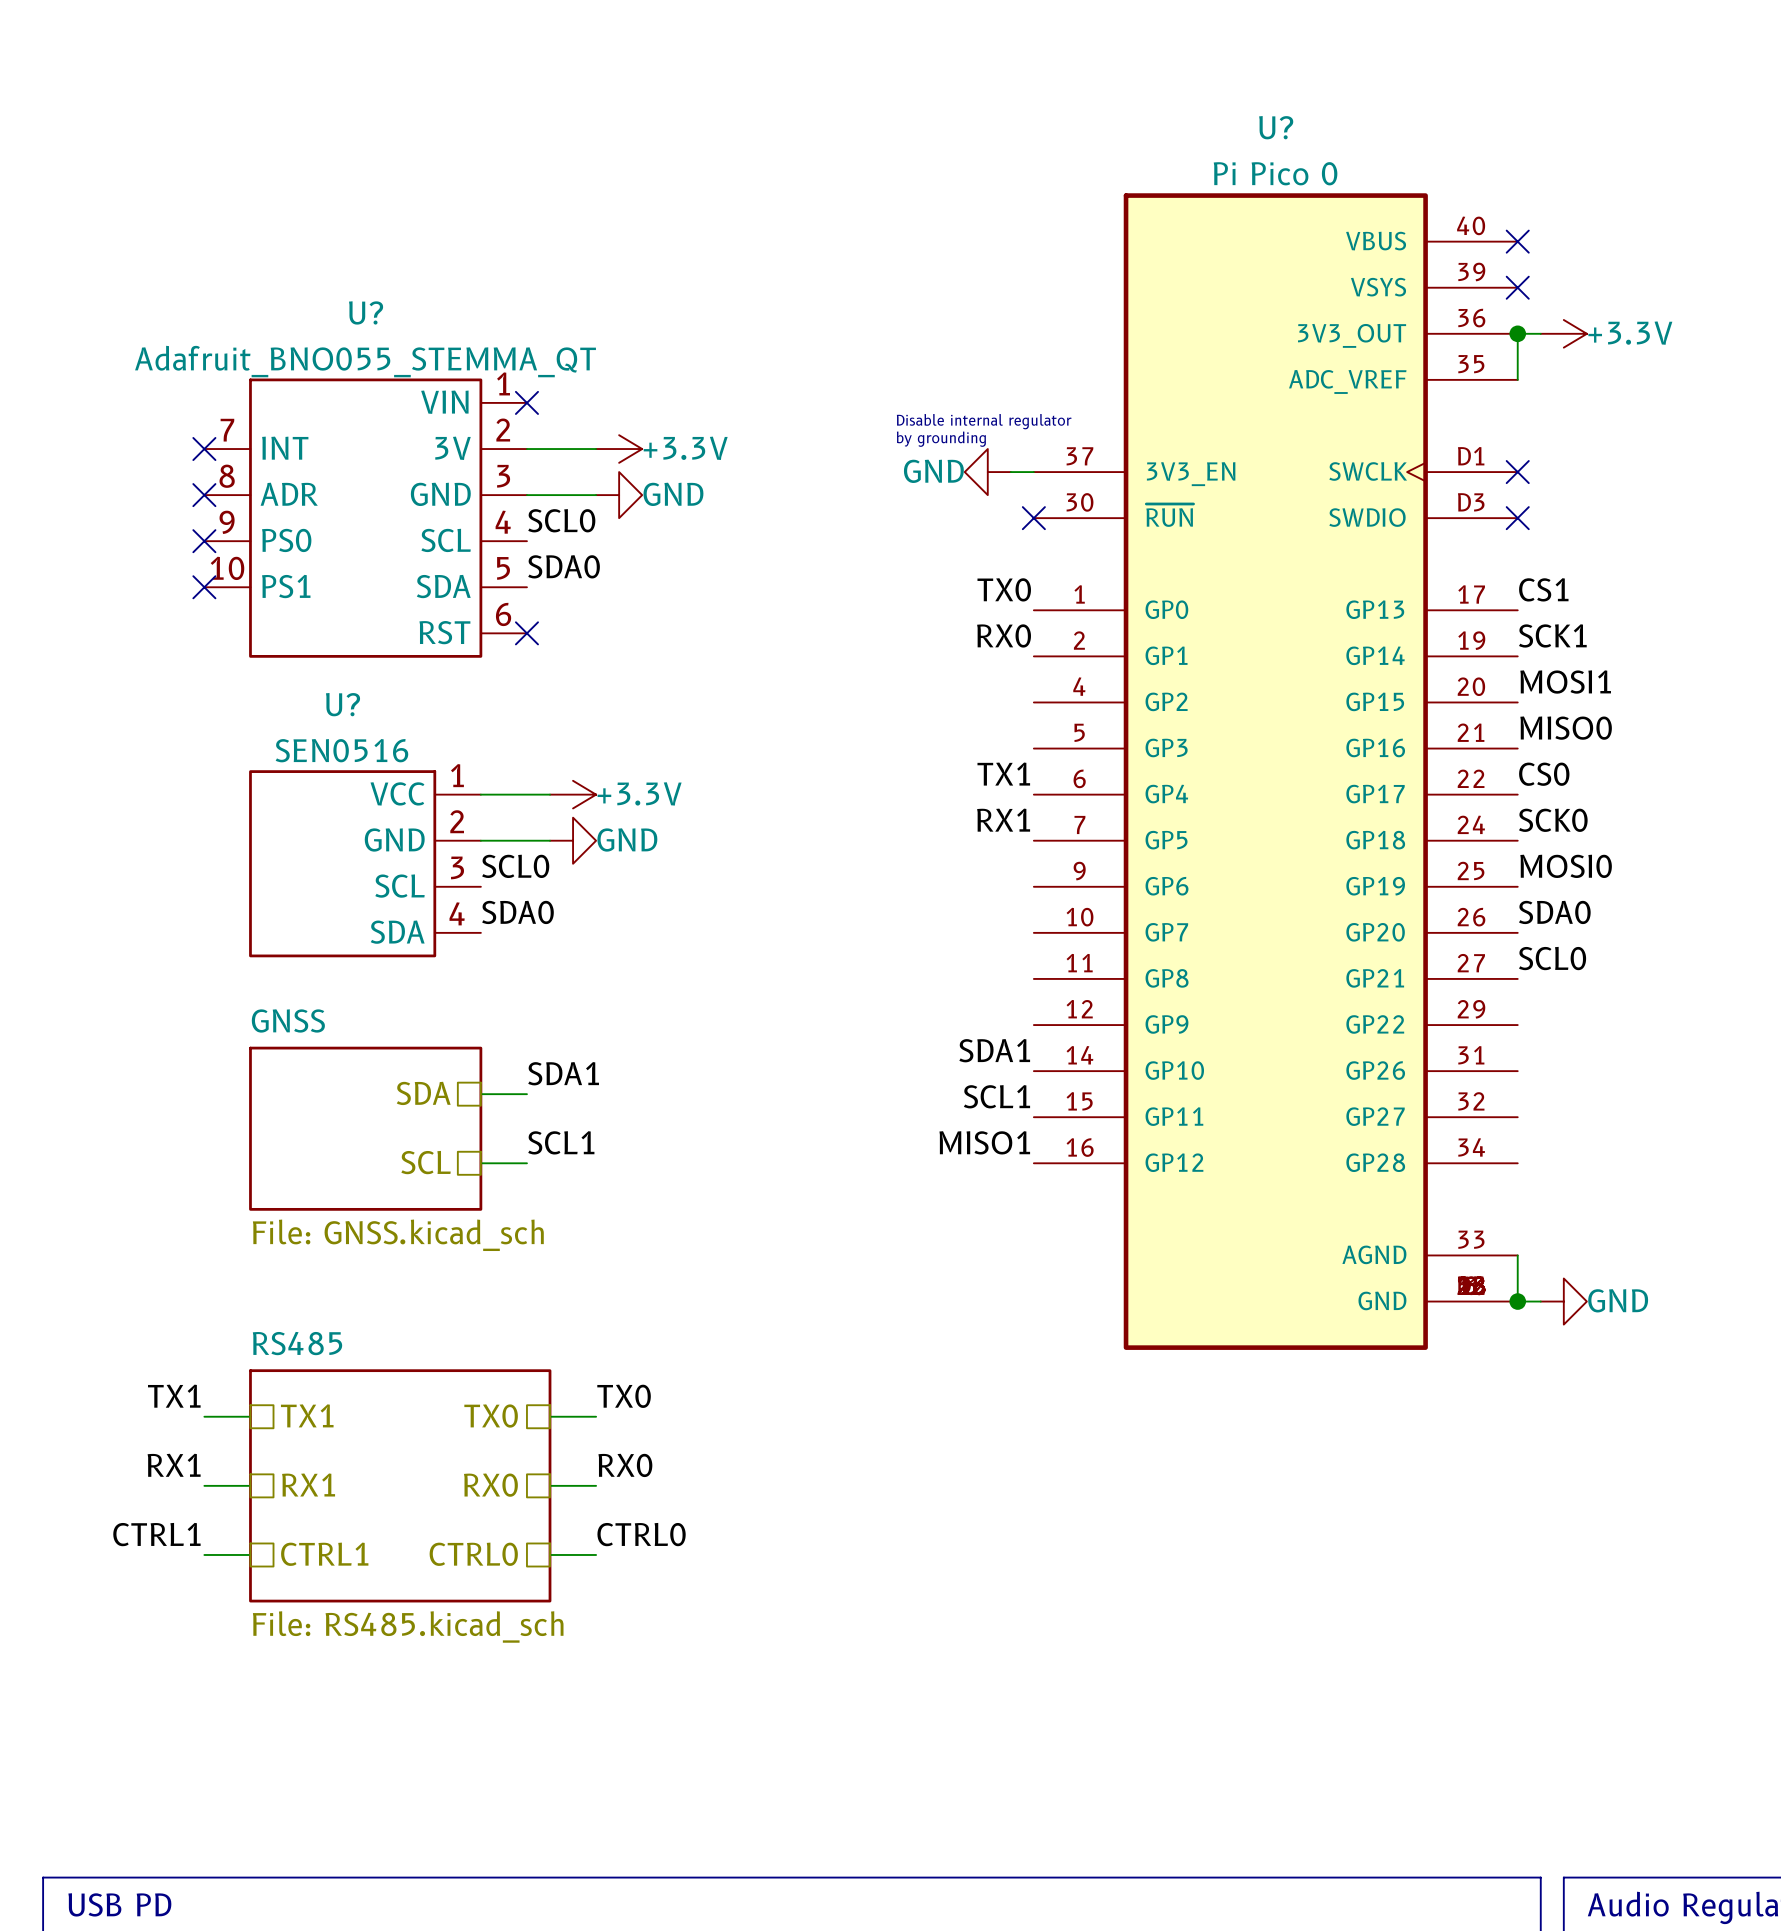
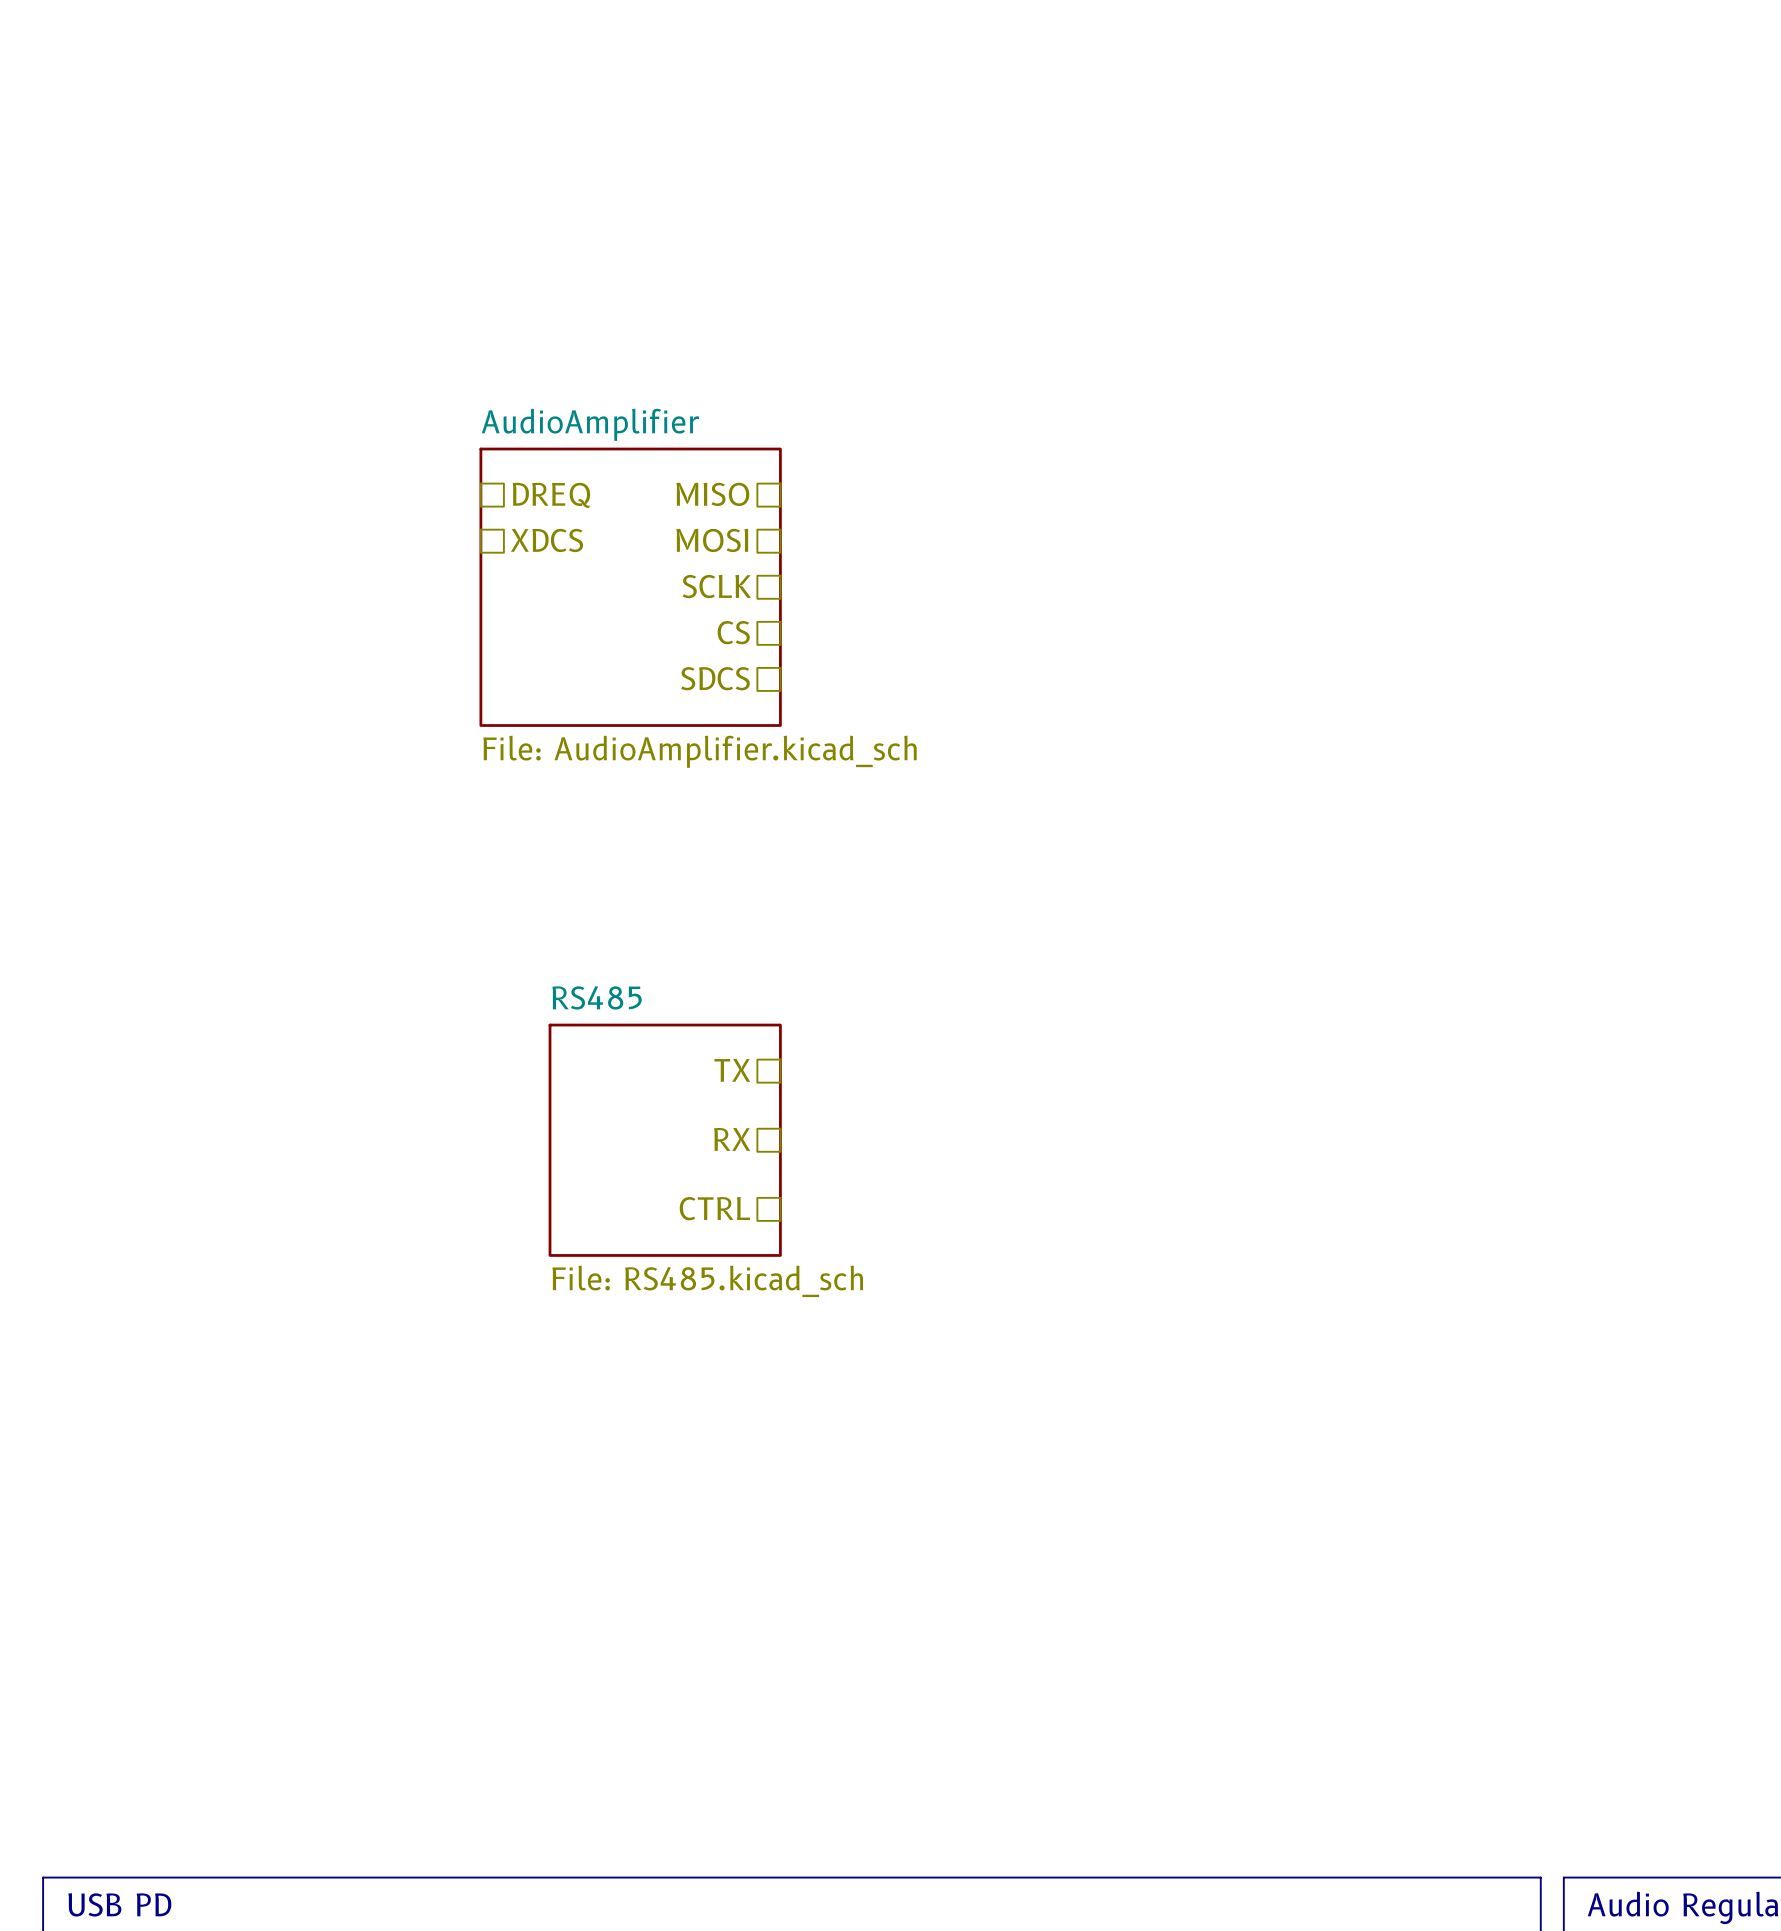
no-connect mark: (1517, 241) -> none
no-connect mark: (1517, 287) -> none
junction: (1517, 333) -> none
wire: (1540, 333) (1517, 333) (1517, 379) -> none
power symbol: +3.3V (1563, 333) -> none
no-connect mark: (526, 402) -> none
text: Disable internal regulator (984, 421) -> none
text: by grounding (941, 439) -> none
no-connect mark: (204, 449) -> none
power symbol: +3.3V (619, 449) -> none
power symbol: GND (987, 472) -> none
wire: (1010, 472) (1033, 472) -> none
no-connect mark: (1517, 472) -> none
hierarchical label: none -> MISO (712, 494)
no-connect mark: (204, 495) -> none
wire: (526, 495) (596, 495) -> none
hierarchical label: none -> DREQ (551, 495)
power symbol: GND (619, 495) -> none
U?: Adafruit_BNO055_STEMMA_QT (365, 518) -> none
no-connect mark: (1033, 518) -> none
no-connect mark: (1517, 518) -> none
label: SCL0 (561, 520) -> none
hierarchical label: none -> XDCS (547, 540)
hierarchical label: none -> MOSI (712, 540)
no-connect mark: (204, 541) -> none
label: SDA0 (564, 566) -> none
hierarchical label: none -> SCLK (716, 586)
no-connect mark: (204, 587) -> none
sheet AudioAmplifier: none -> File: AudioAmplifier.kicad_sch (630, 587)
label: TX0 (1004, 589) -> none
label: CS1 (1543, 589) -> none
hierarchical label: none -> CS (733, 632)
no-connect mark: (526, 633) -> none
label: RX0 (1004, 635) -> none
label: SCK1 (1552, 635) -> none
hierarchical label: none -> SDCS (715, 678)
label: MOSI1 (1565, 682) -> none
label: MISO0 (1566, 728) -> none
U?: Pi Pico 0 (1275, 771) -> none
label: TX1 (1003, 774) -> none
label: CS0 (1544, 774) -> none
wire: (480, 794) (550, 794) -> none
power symbol: +3.3V (573, 794) -> none
label: RX1 (1003, 820) -> none
label: SCK0 (1553, 820) -> none
wire: (480, 840) (550, 840) -> none
power symbol: GND (573, 840) -> none
U?: SEN0516 (364, 863) -> none
label: SCL0 (515, 866) -> none
label: MOSI0 (1566, 866) -> none
label: SDA0 (517, 912) -> none
label: SDA0 (1554, 912) -> none
label: SCL0 (1552, 958) -> none
label: SDA1 (994, 1050) -> none
hierarchical label: none -> TX (732, 1070)
label: SDA1 (563, 1073) -> none
hierarchical label: SDA (423, 1093) -> none
wire: (480, 1094) (526, 1094) -> none
label: SCL1 (996, 1096) -> none
sheet GNSS: File: GNSS.kicad_sch (365, 1128) -> none
hierarchical label: none -> RX (732, 1139)
label: SCL1 (561, 1142) -> none
label: MISO1 (984, 1142) -> none
hierarchical label: SCL (426, 1162) -> none
wire: (480, 1163) (526, 1163) -> none
hierarchical label: none -> CTRL (714, 1208)
wire: (1517, 1255) (1517, 1301) (1540, 1301) -> none
junction: (1517, 1301) -> none
power symbol: GND (1563, 1301) -> none
sheet RS485 shape: [249, 1369, 552, 1603] -> [548, 1023, 782, 1257]
label: TX1 (174, 1396) -> none
label: TX0 (624, 1396) -> none
hierarchical label: TX1 (307, 1415) -> none
wire: (204, 1416) (250, 1416) -> none
hierarchical label: TX0 (491, 1416) -> none
wire: (550, 1416) (596, 1416) -> none
label: RX1 (174, 1465) -> none
label: RX0 (625, 1465) -> none
wire: (204, 1485) (250, 1485) -> none
hierarchical label: RX1 (308, 1485) -> none
hierarchical label: RX0 (490, 1485) -> none
wire: (550, 1485) (596, 1485) -> none
label: CTRL1 (156, 1534) -> none
label: CTRL0 (641, 1534) -> none
wire: (204, 1554) (250, 1554) -> none
hierarchical label: CTRL1 (324, 1554) -> none
hierarchical label: CTRL0 (473, 1554) -> none
wire: (550, 1554) (596, 1554) -> none

